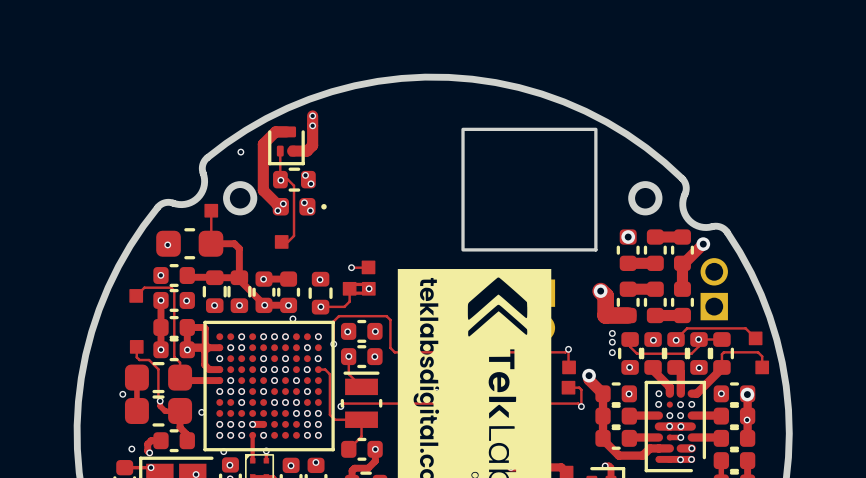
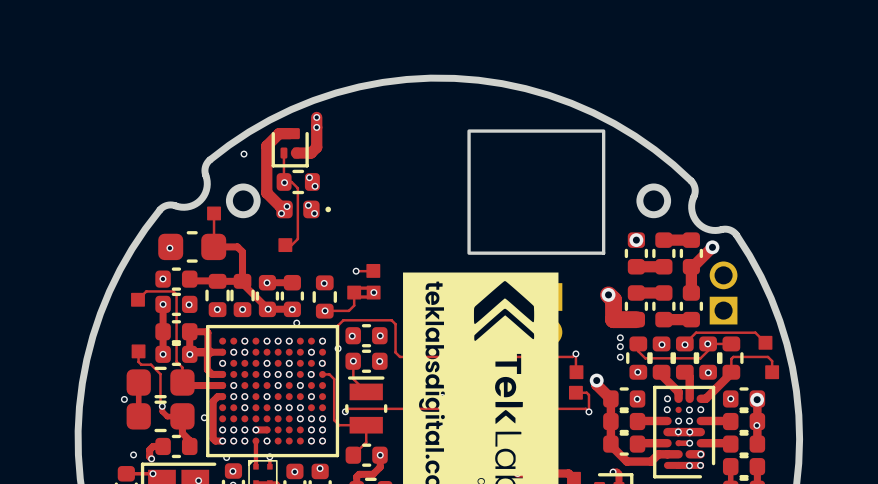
track: none -> (222, 396) (217, 396) (213, 401) (213, 438) (215, 441) (222, 441)
via: (219, 391) -> none

